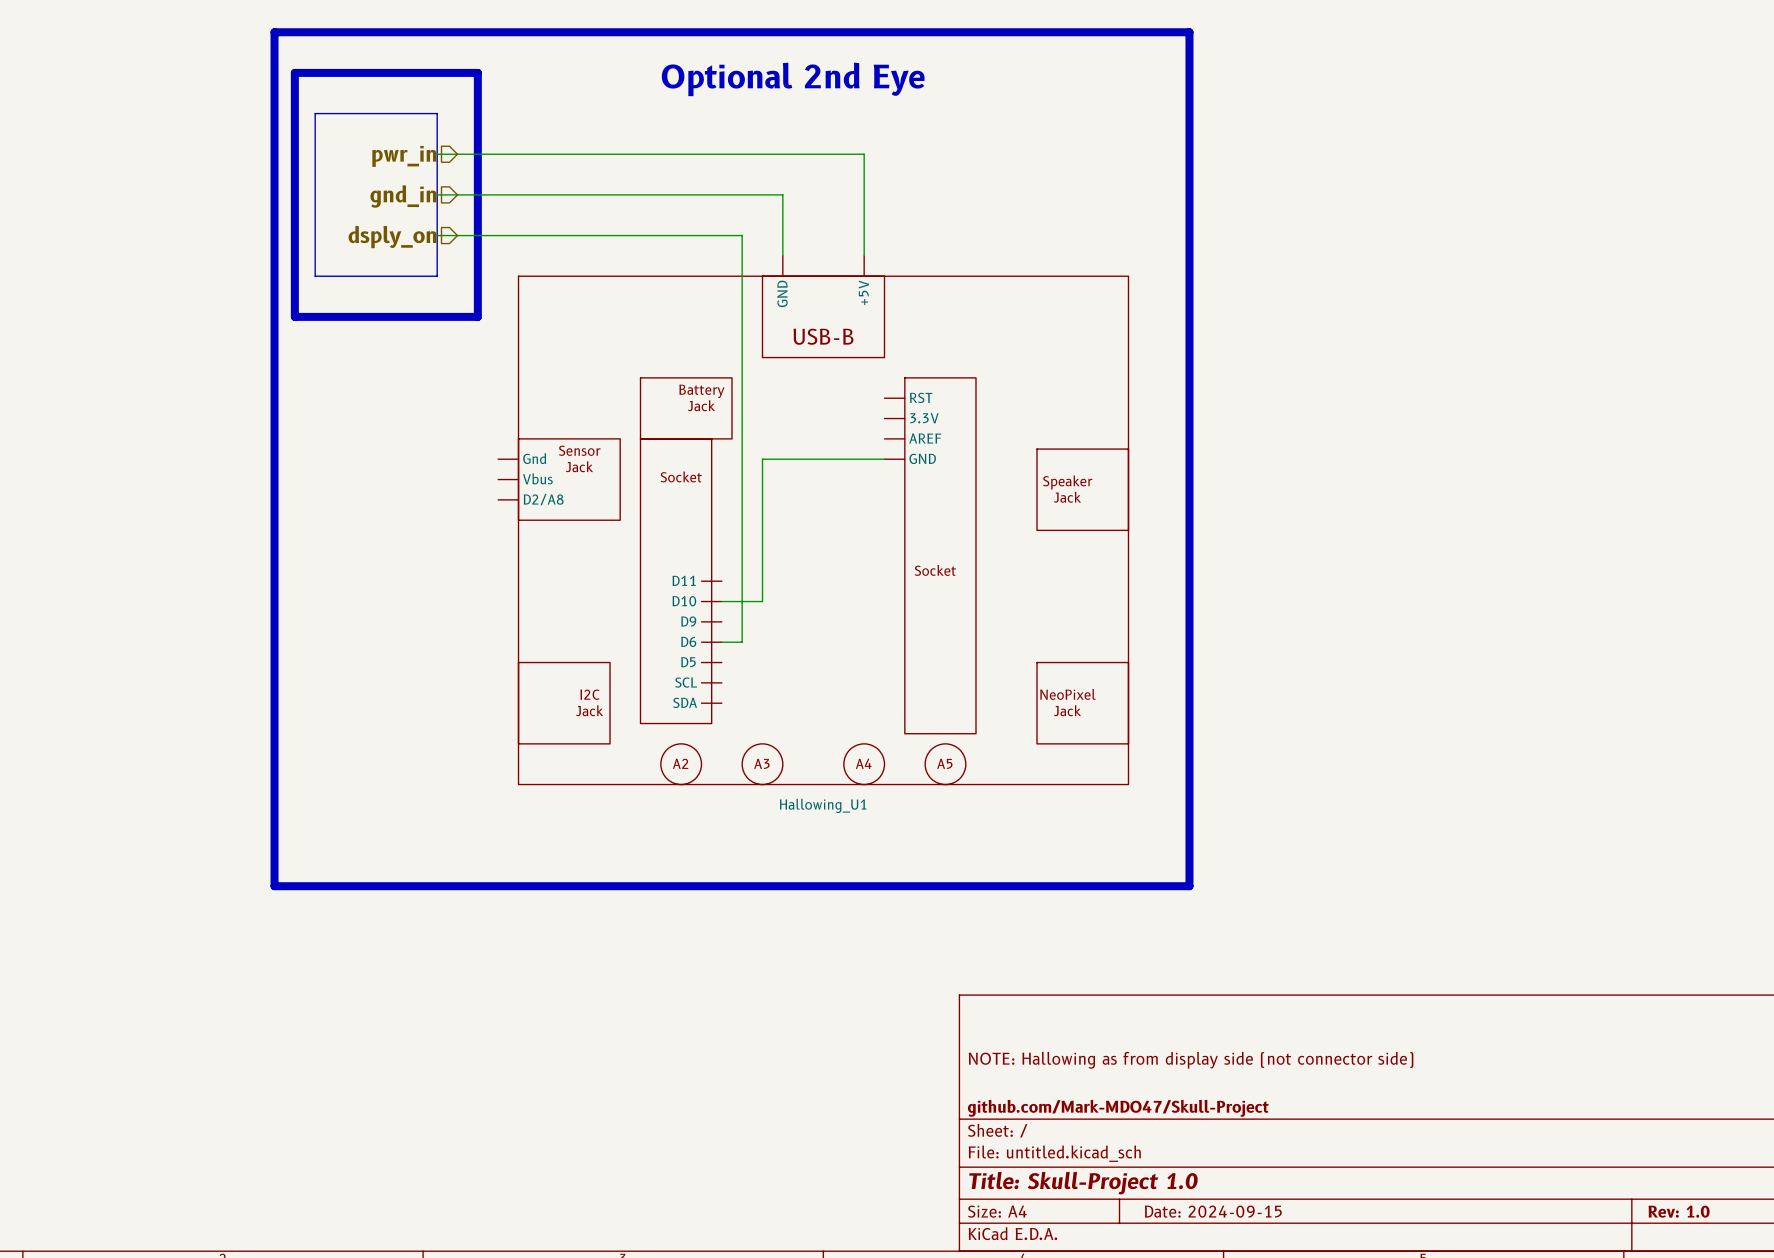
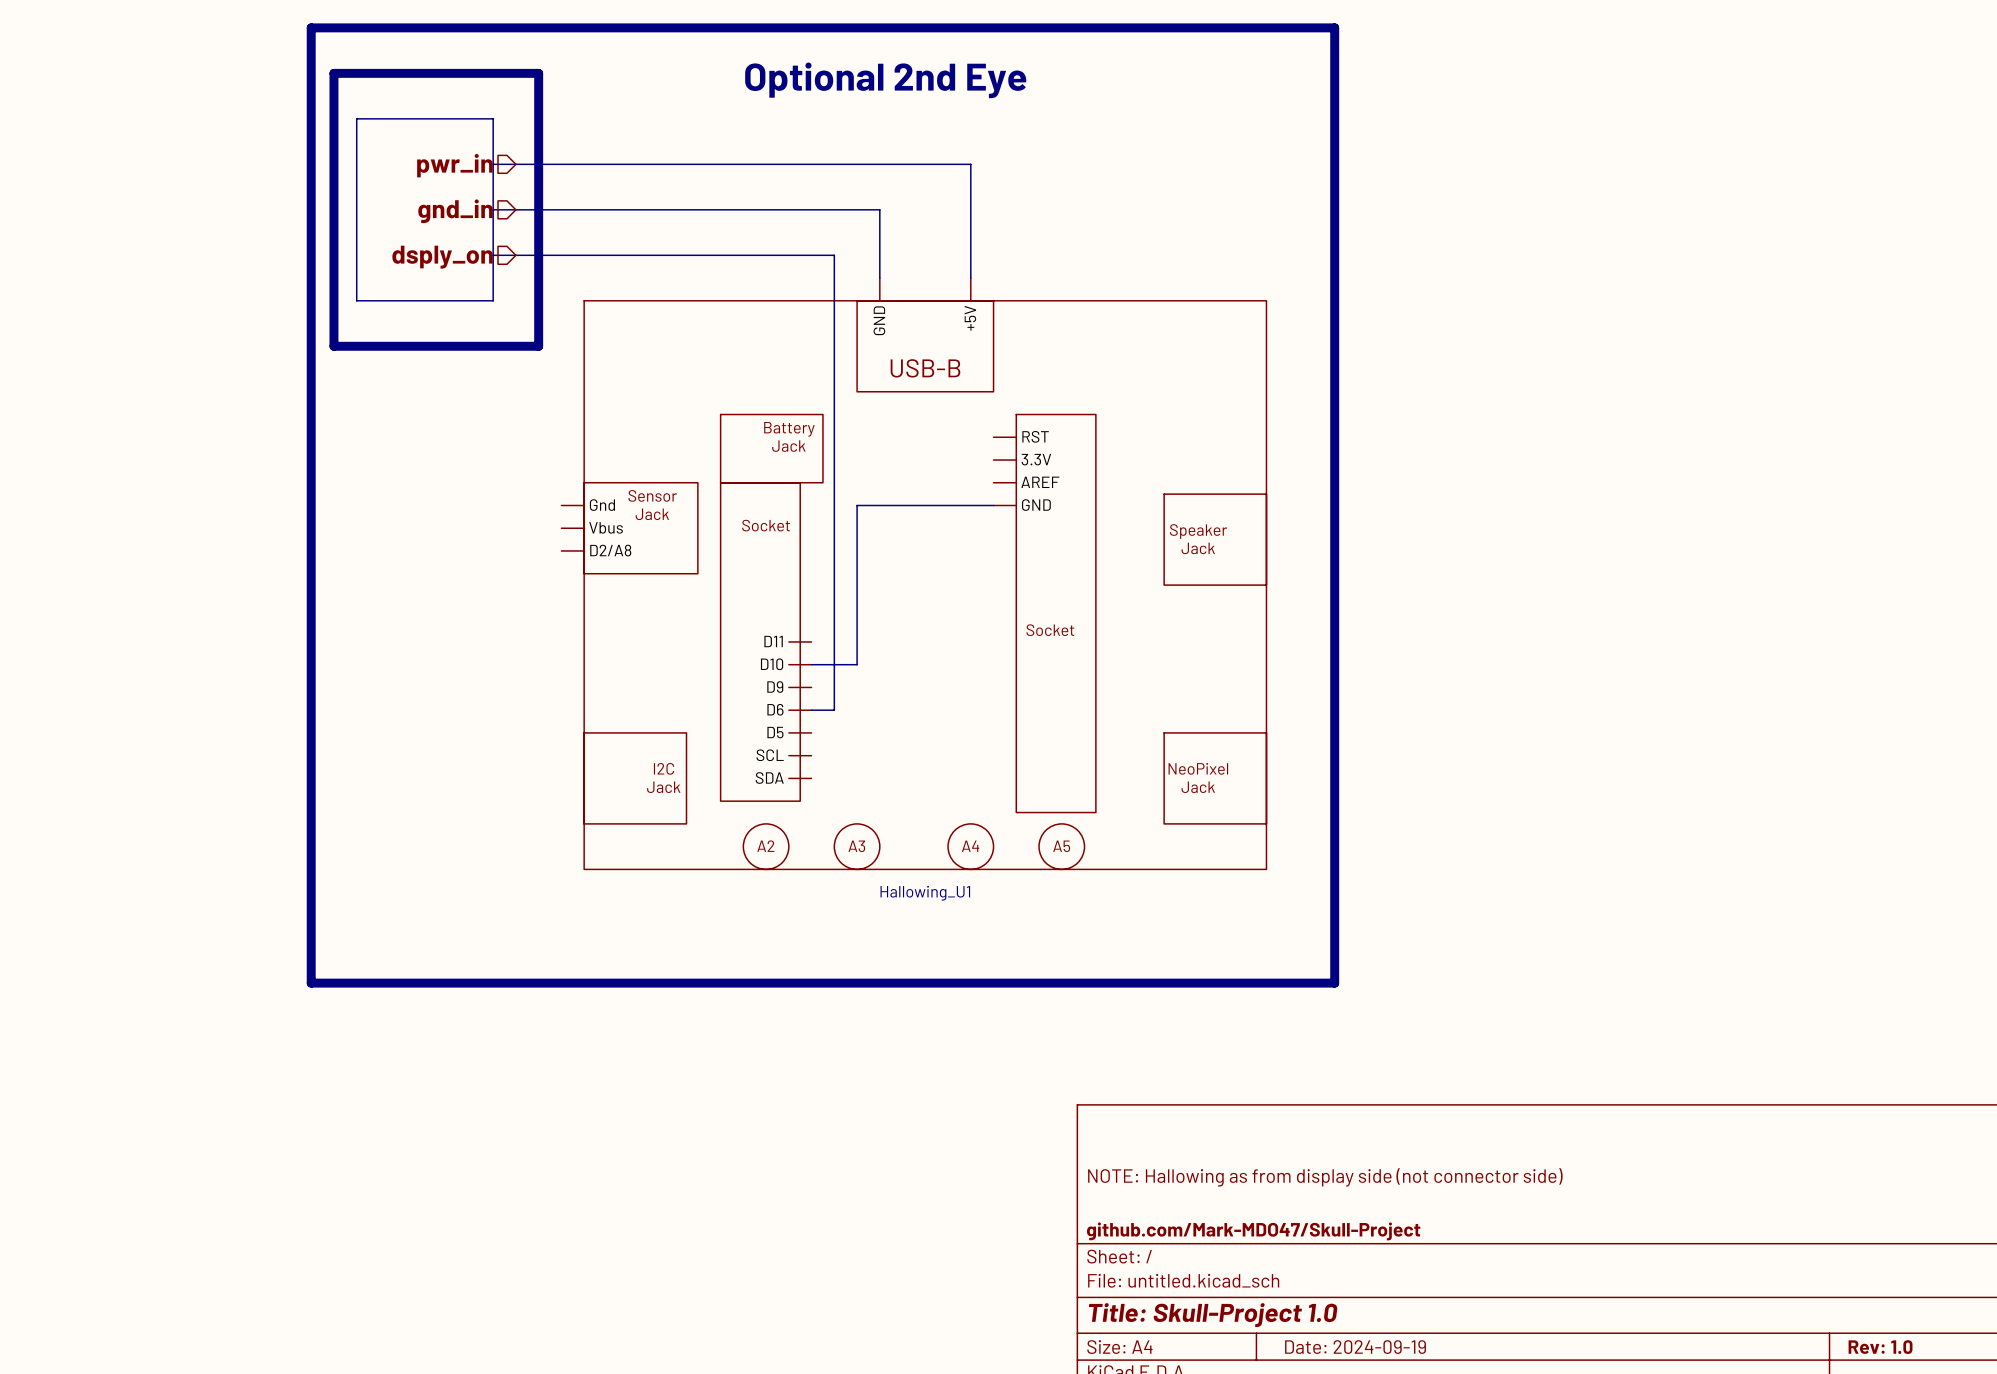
title block: Date: 2024-09-15 (1213, 1211) -> Date: 2024-09-19 (1355, 1347)

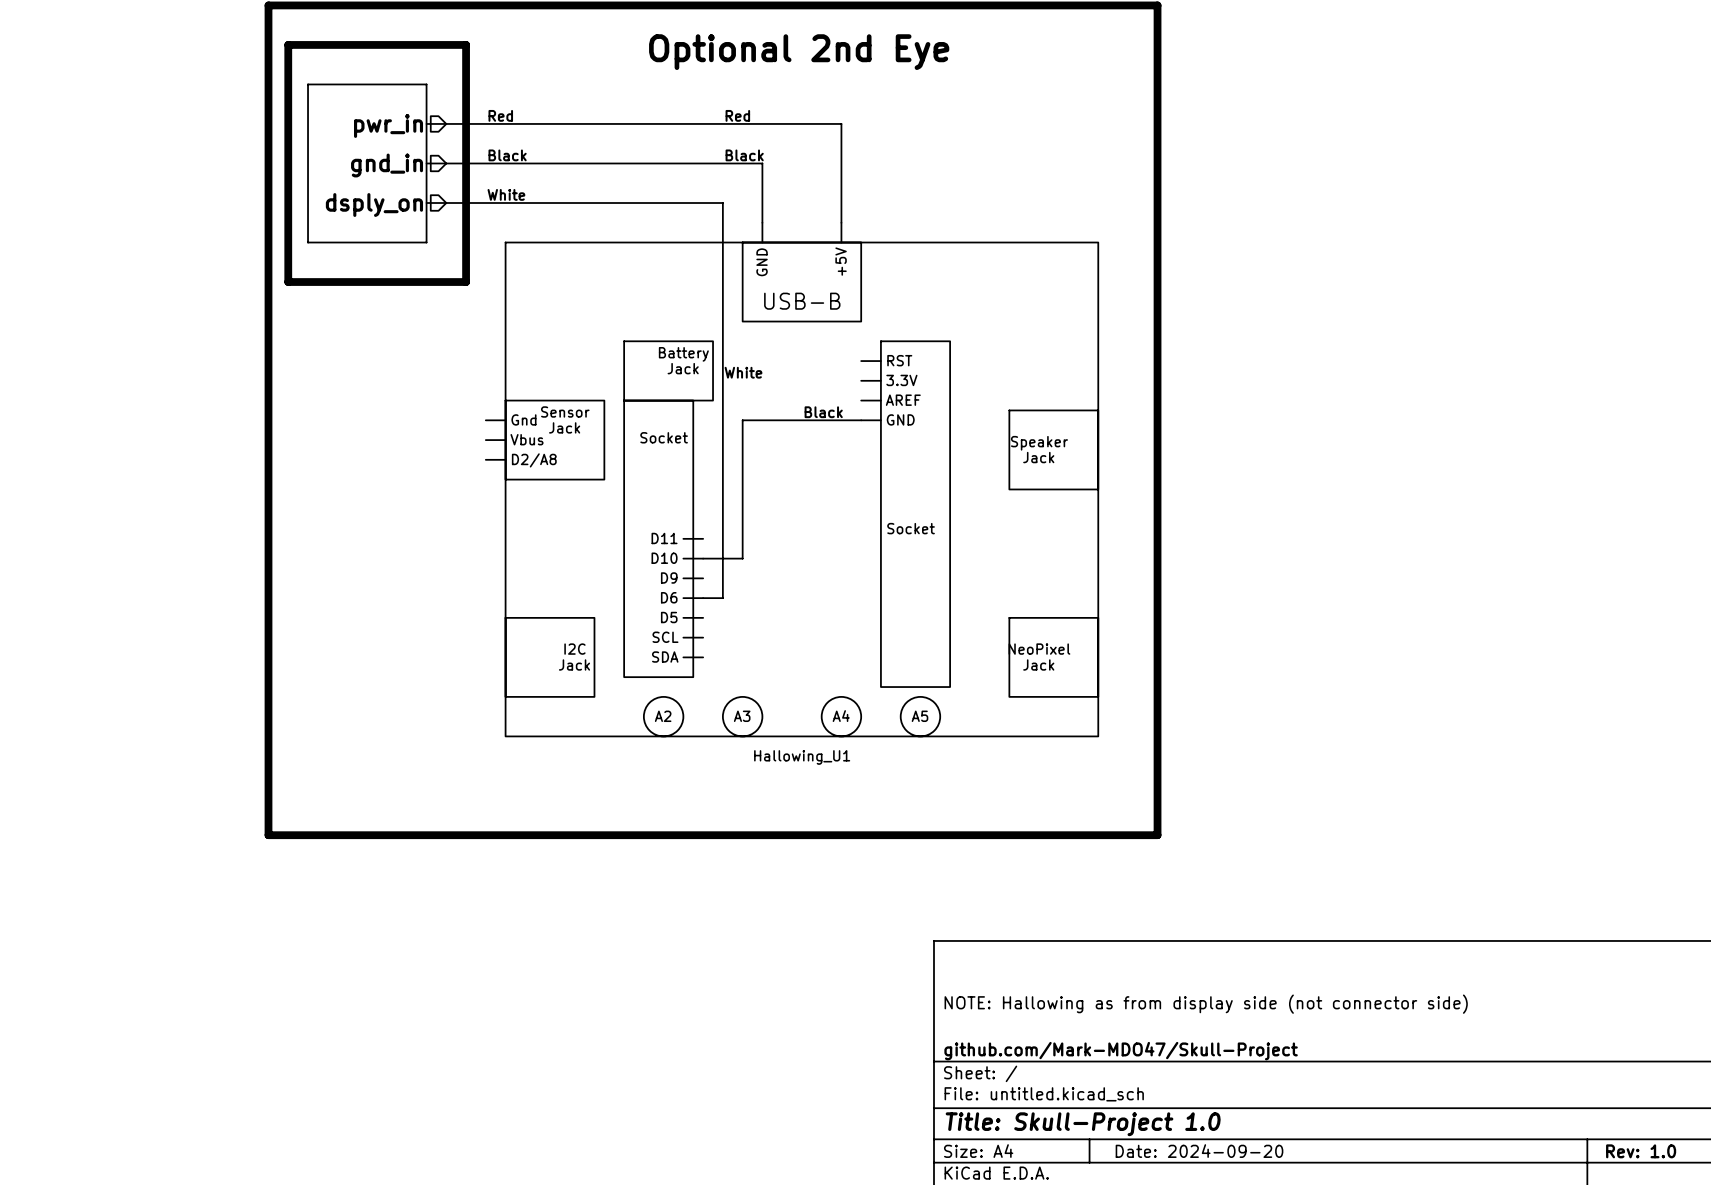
text: none -> Red (500, 115)
text: none -> Red (737, 115)
text: none -> Black (507, 155)
text: none -> Black (744, 155)
text: none -> White (506, 194)
text: none -> White (743, 372)
text: none -> Black (823, 412)
title block: Date: 2024-09-19 (1355, 1347) -> Date: 2024-09-20 (1199, 1151)

